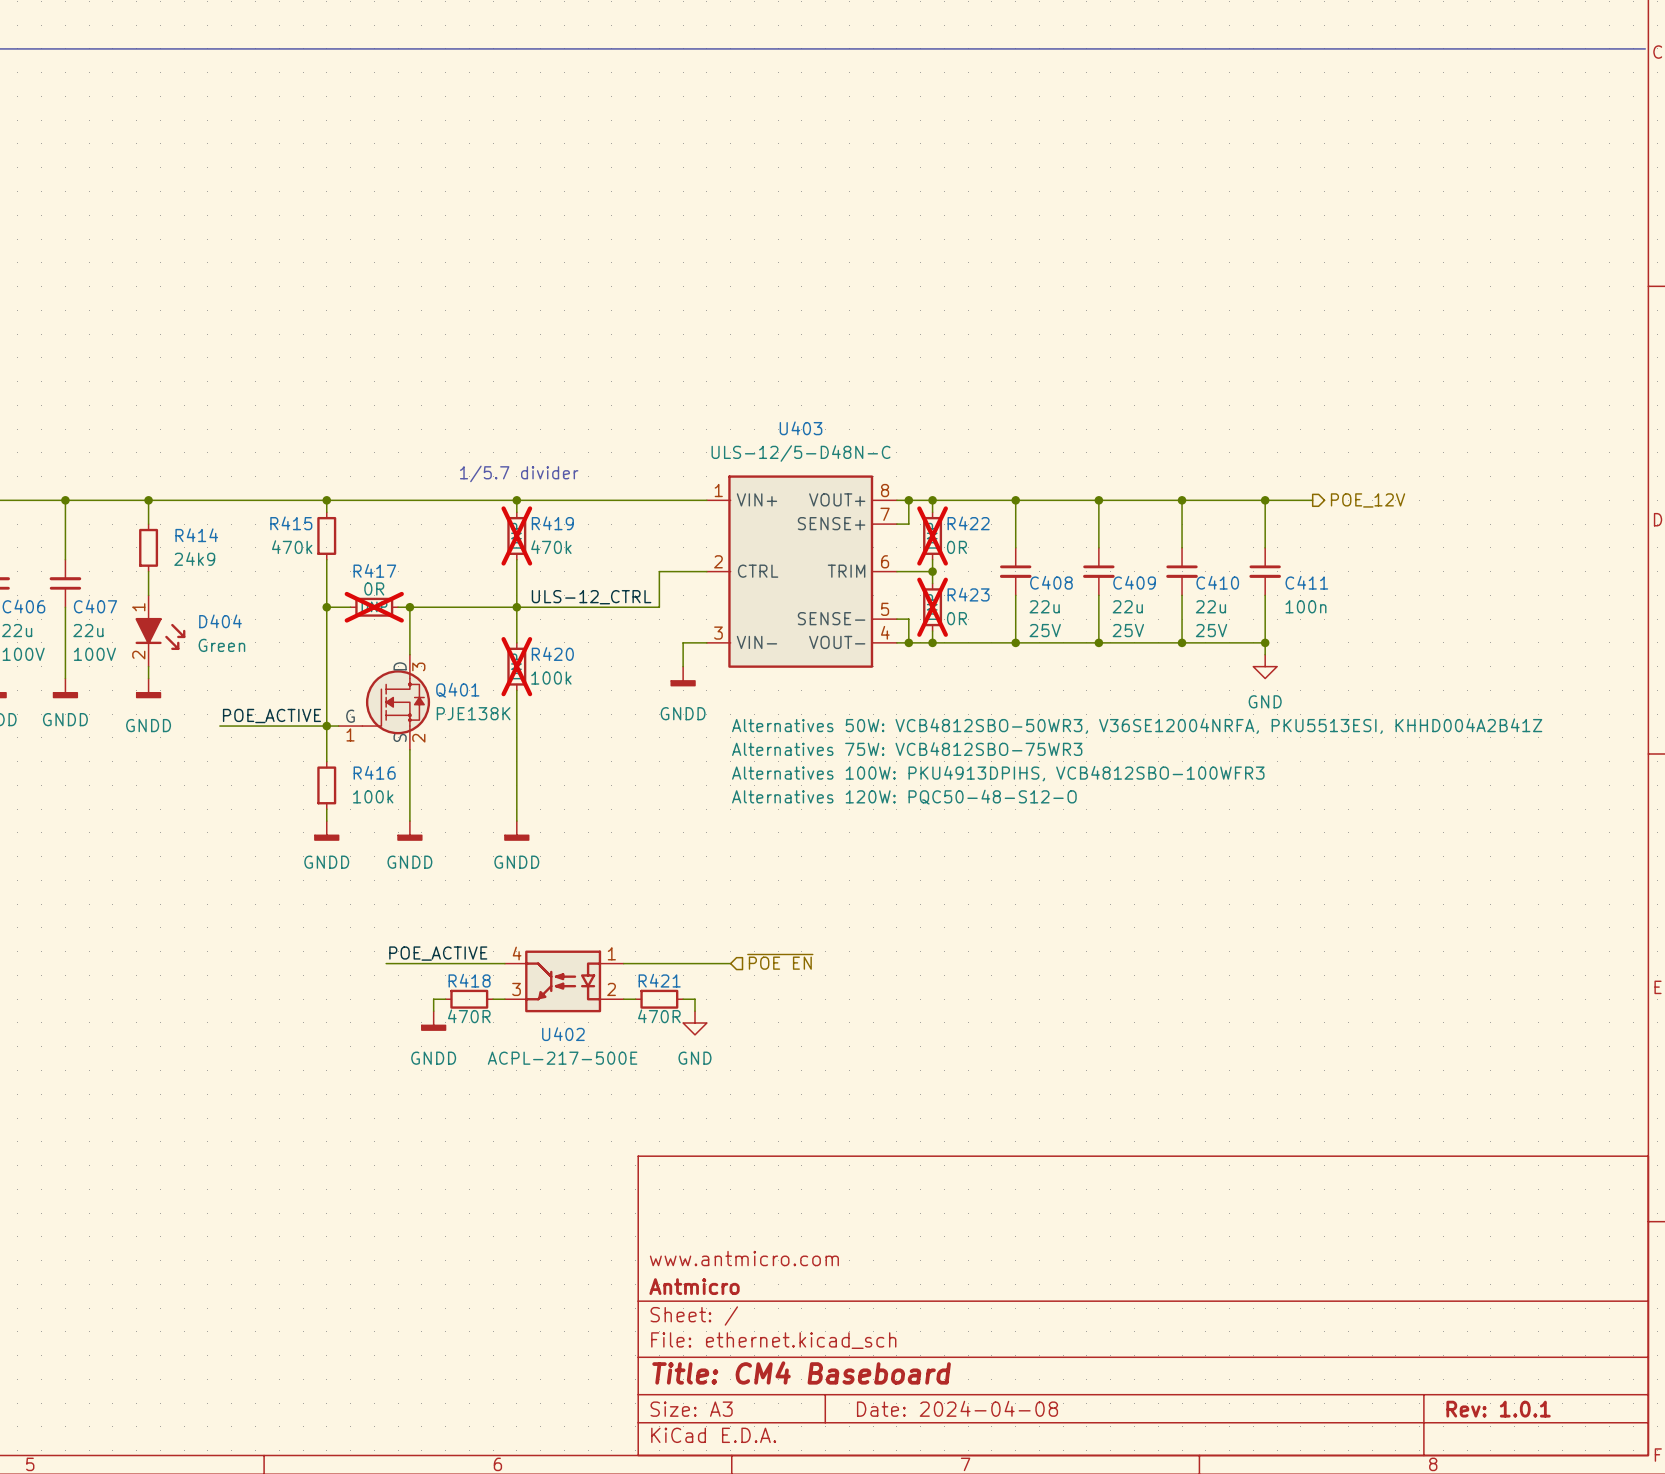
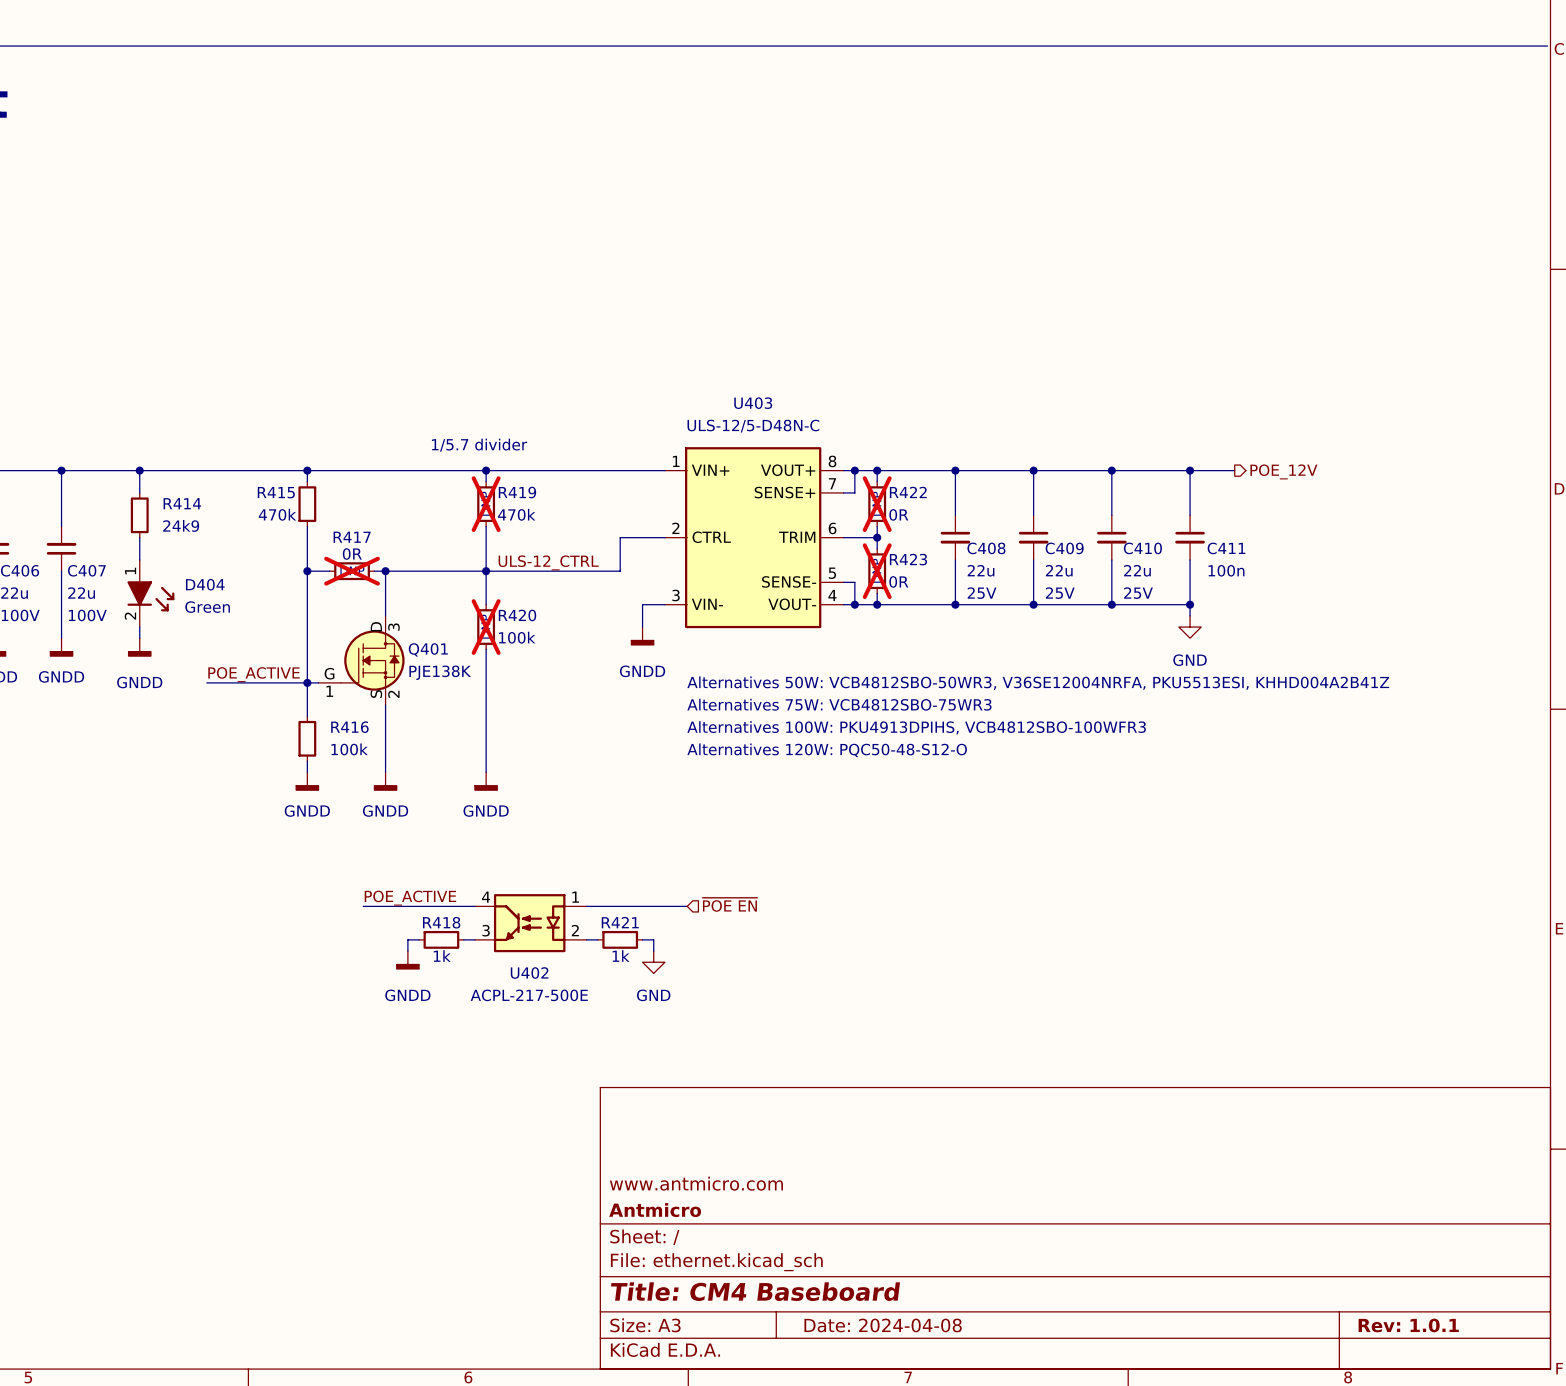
R418 text: 470R (469, 1016) -> 1k (442, 956)
R421 text: 470R (659, 1016) -> 1k (621, 956)

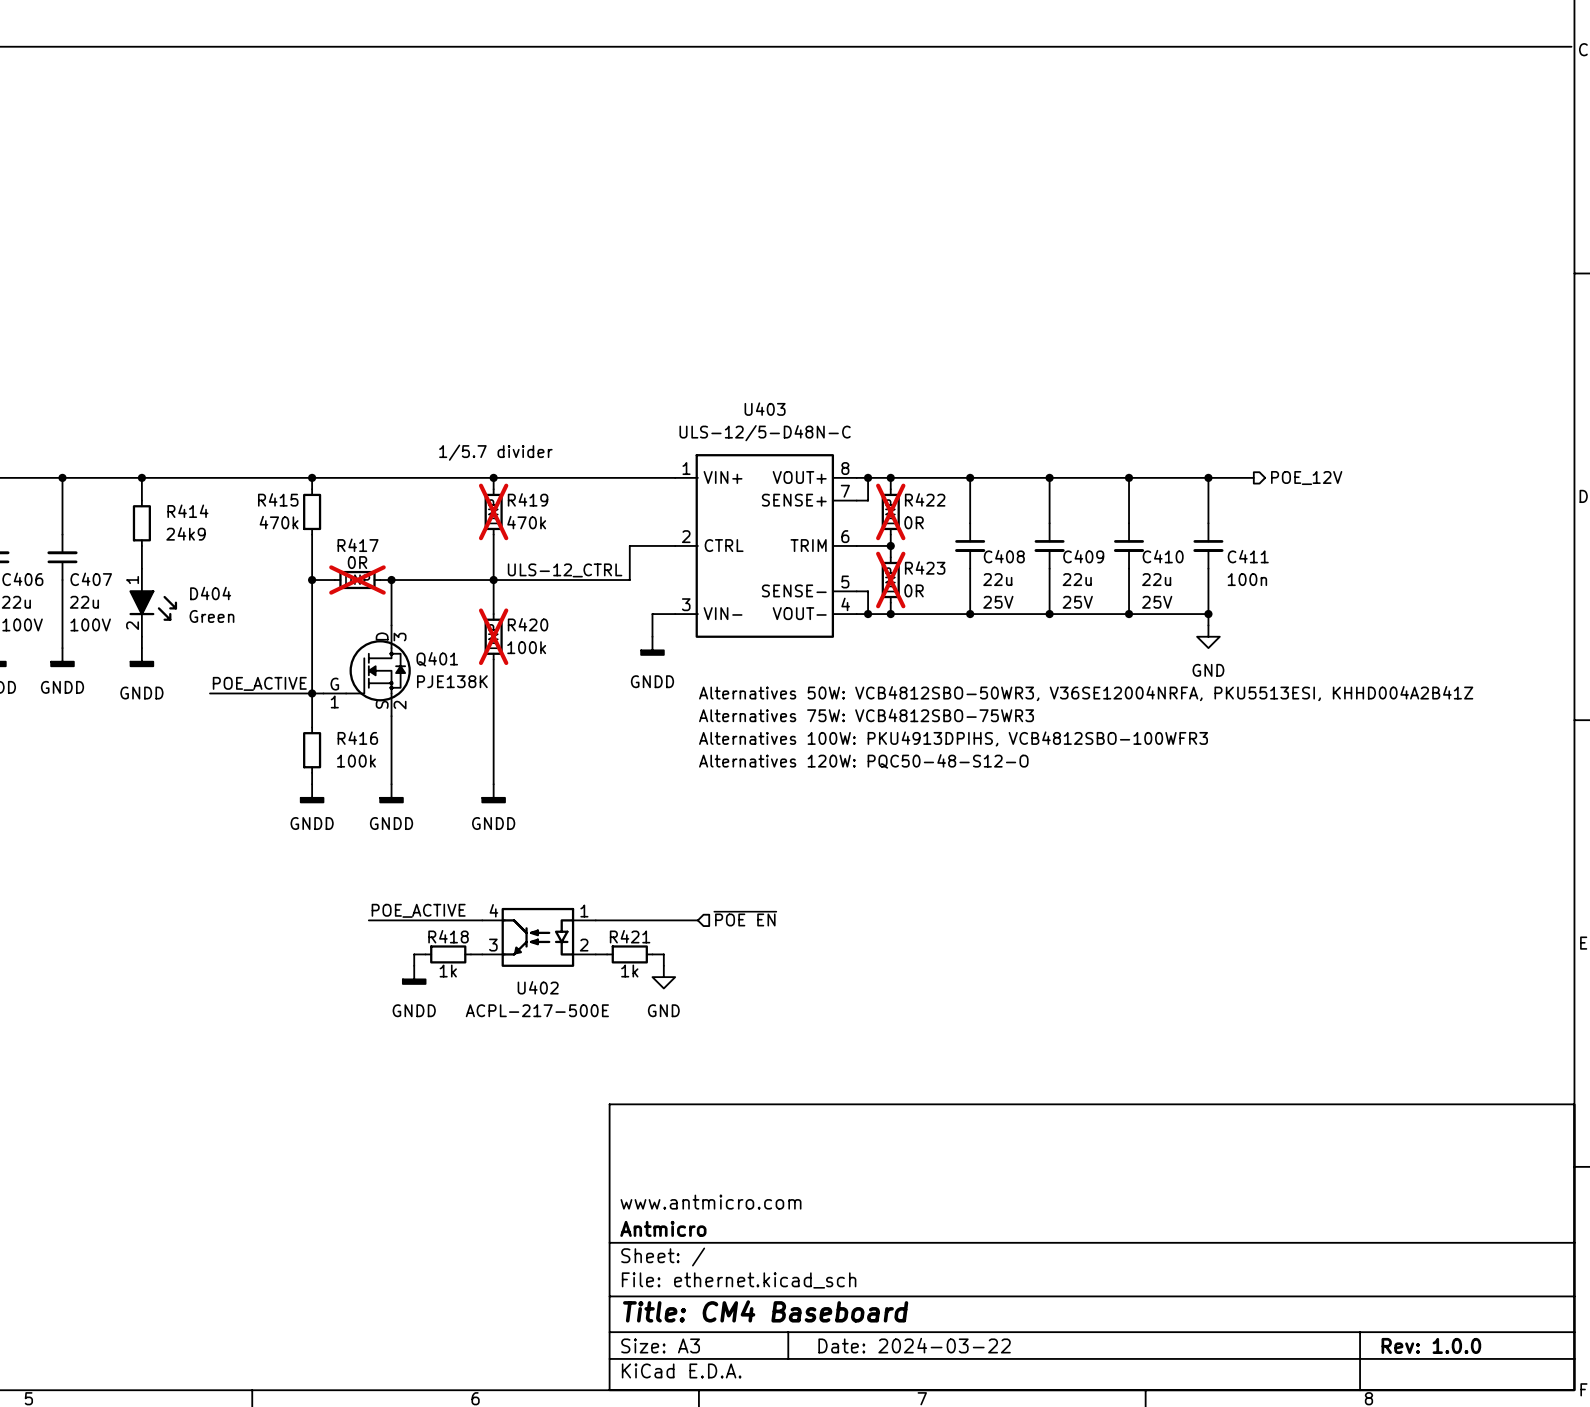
title block: Date: 2024-04-08 (883, 1325) -> Date: 2024-03-22 (914, 1345)
title block: Rev: 1.0.1 (1408, 1325) -> Rev: 1.0.0 (1431, 1345)

